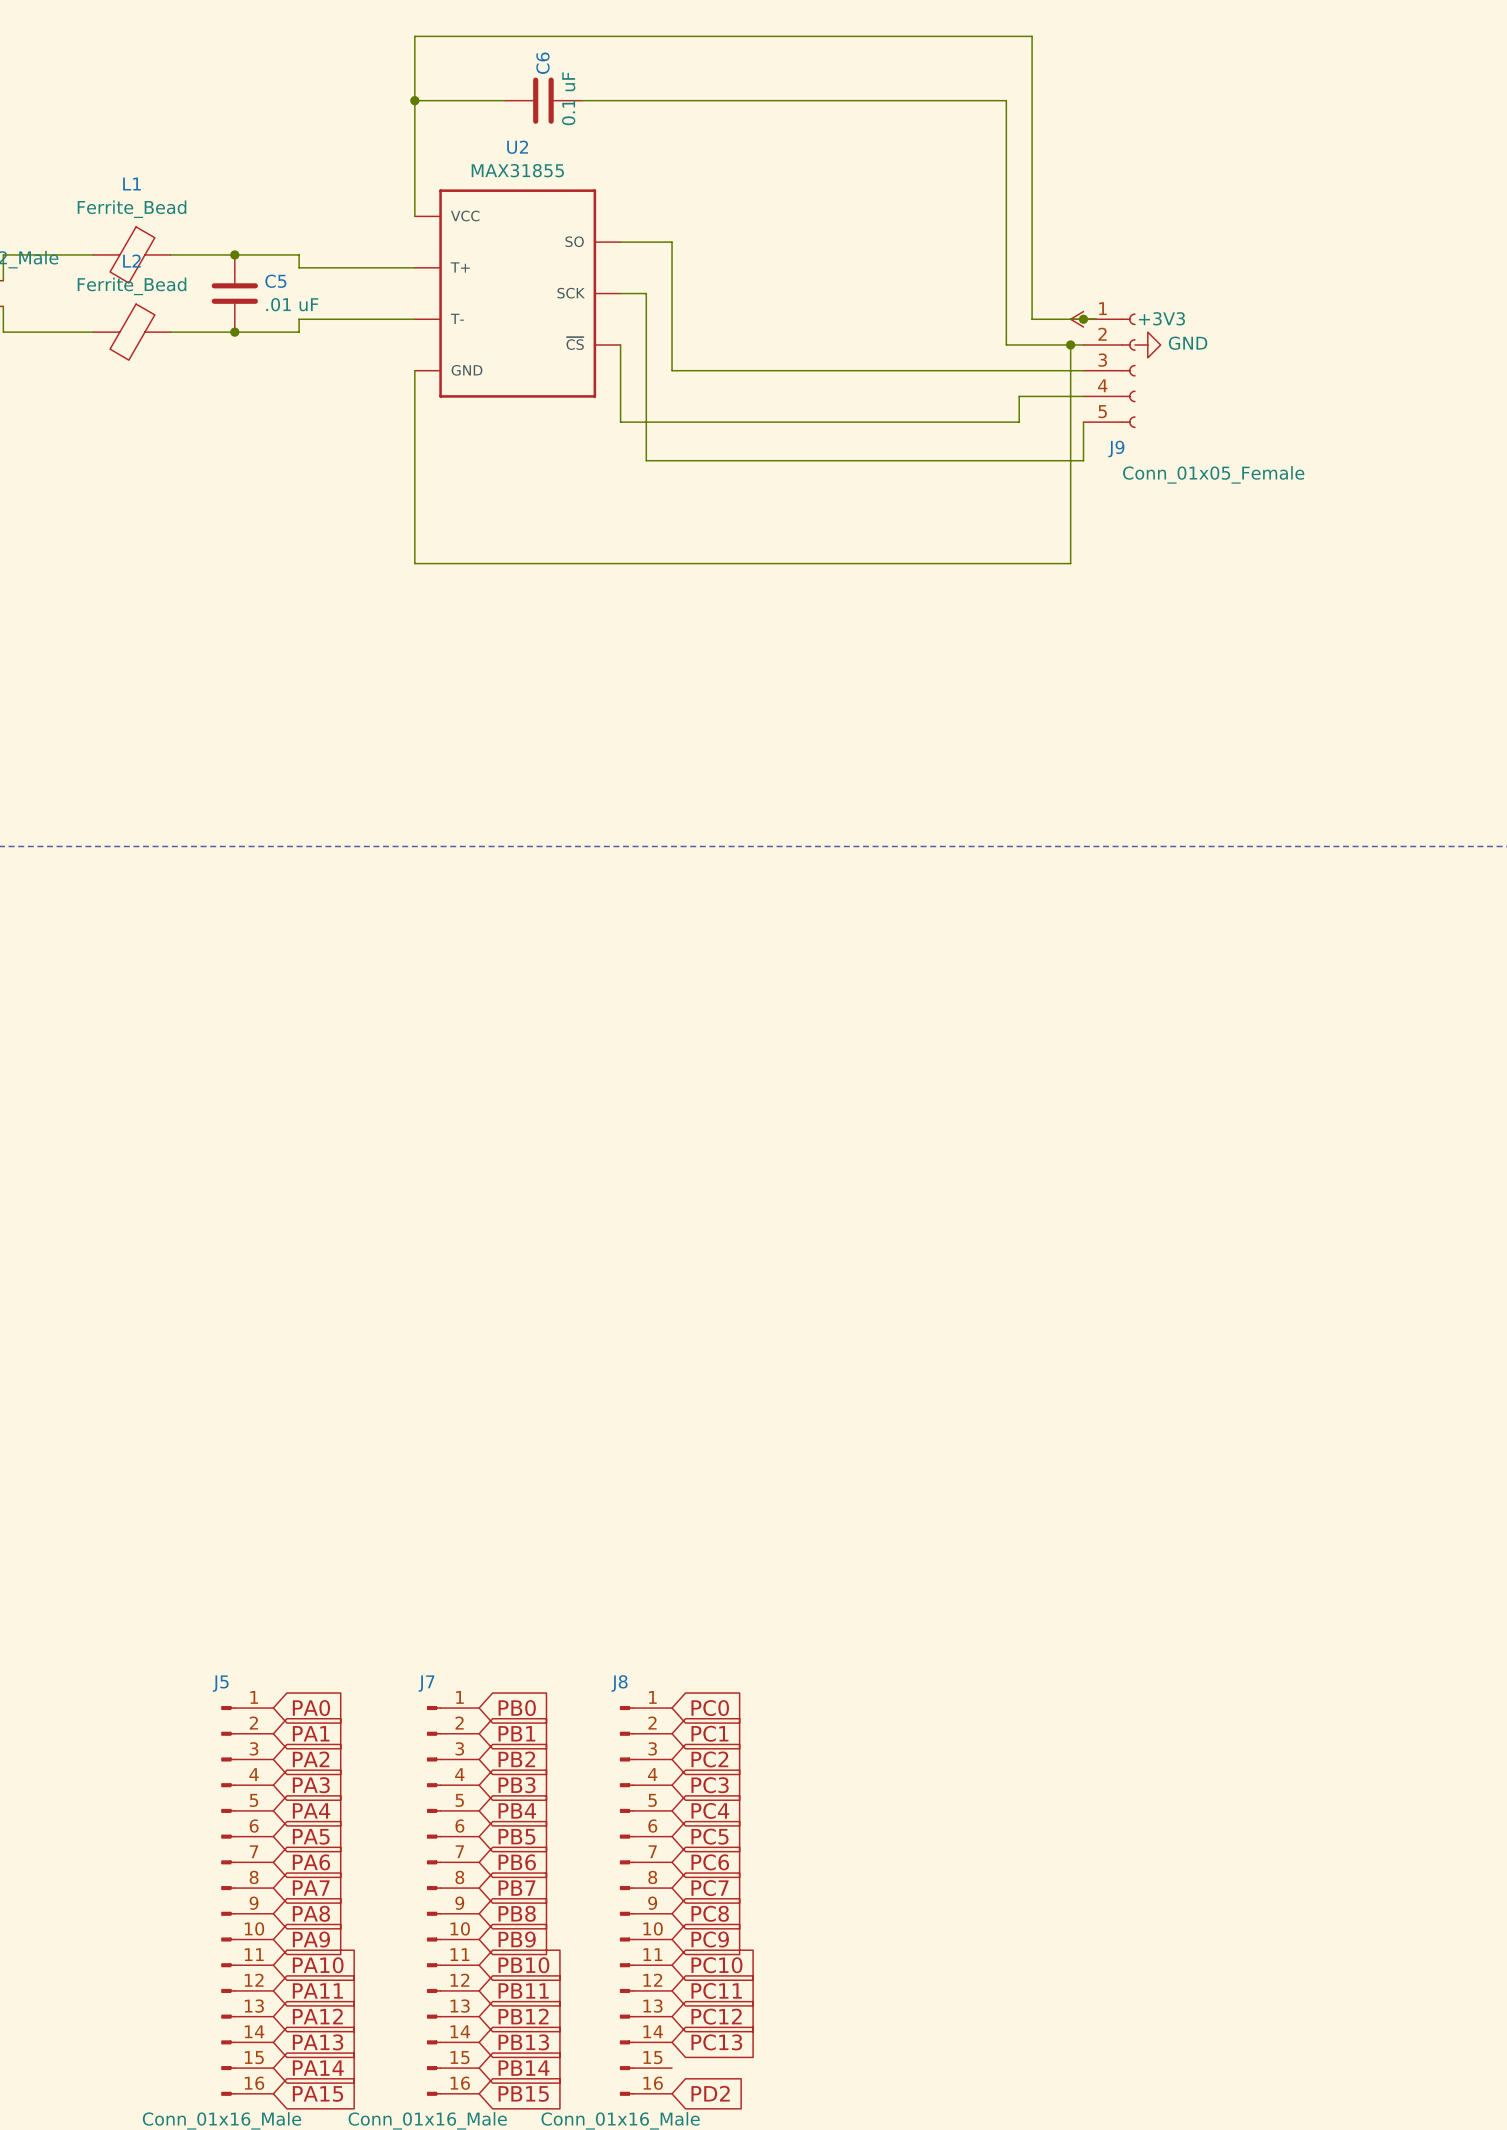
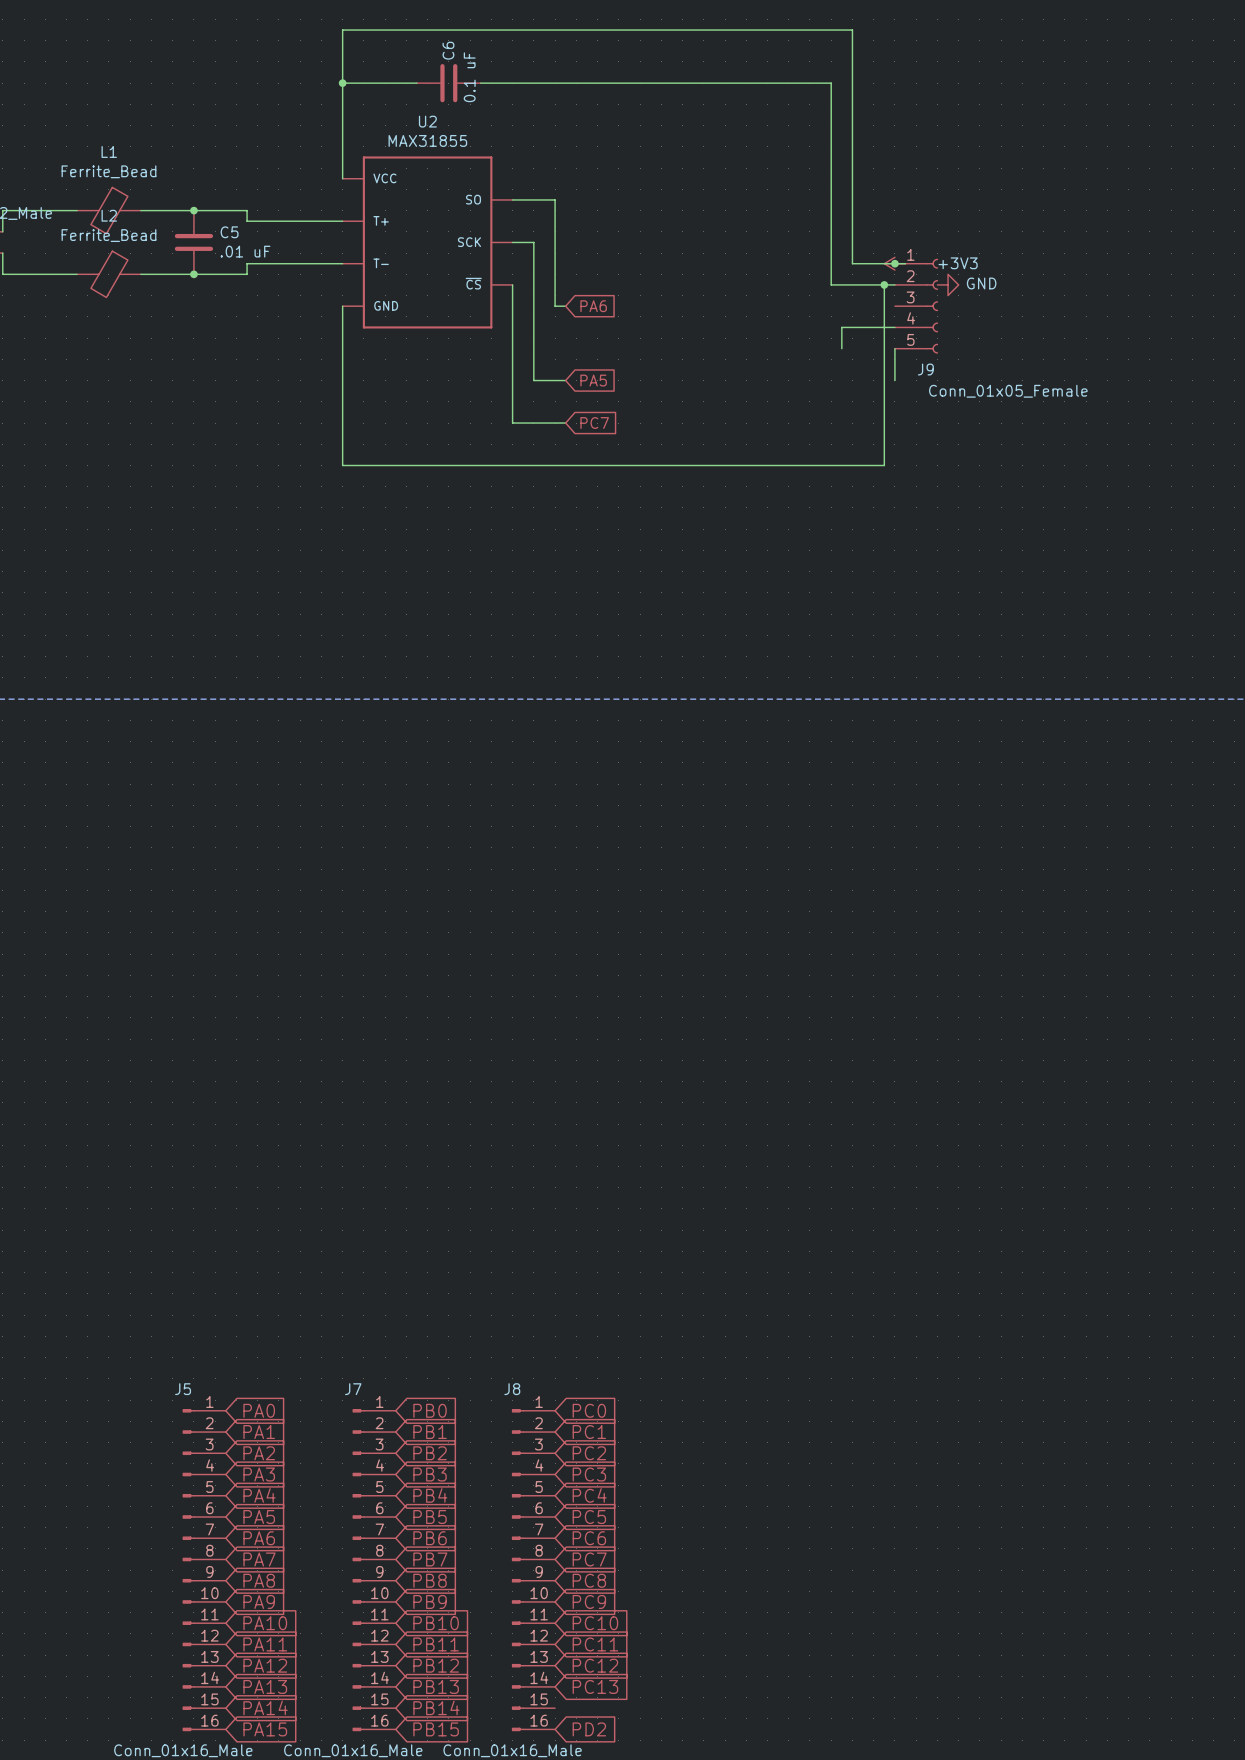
wire: (684, 370) (1083, 370) -> none
global label: none -> PA6 (593, 306)
wire: (620, 422) (1019, 422) -> (512, 348) (512, 423) (565, 423)
wire: (684, 460) (1083, 460) -> none
global label: none -> PA5 (593, 380)
global label: none -> PC7 (594, 423)

